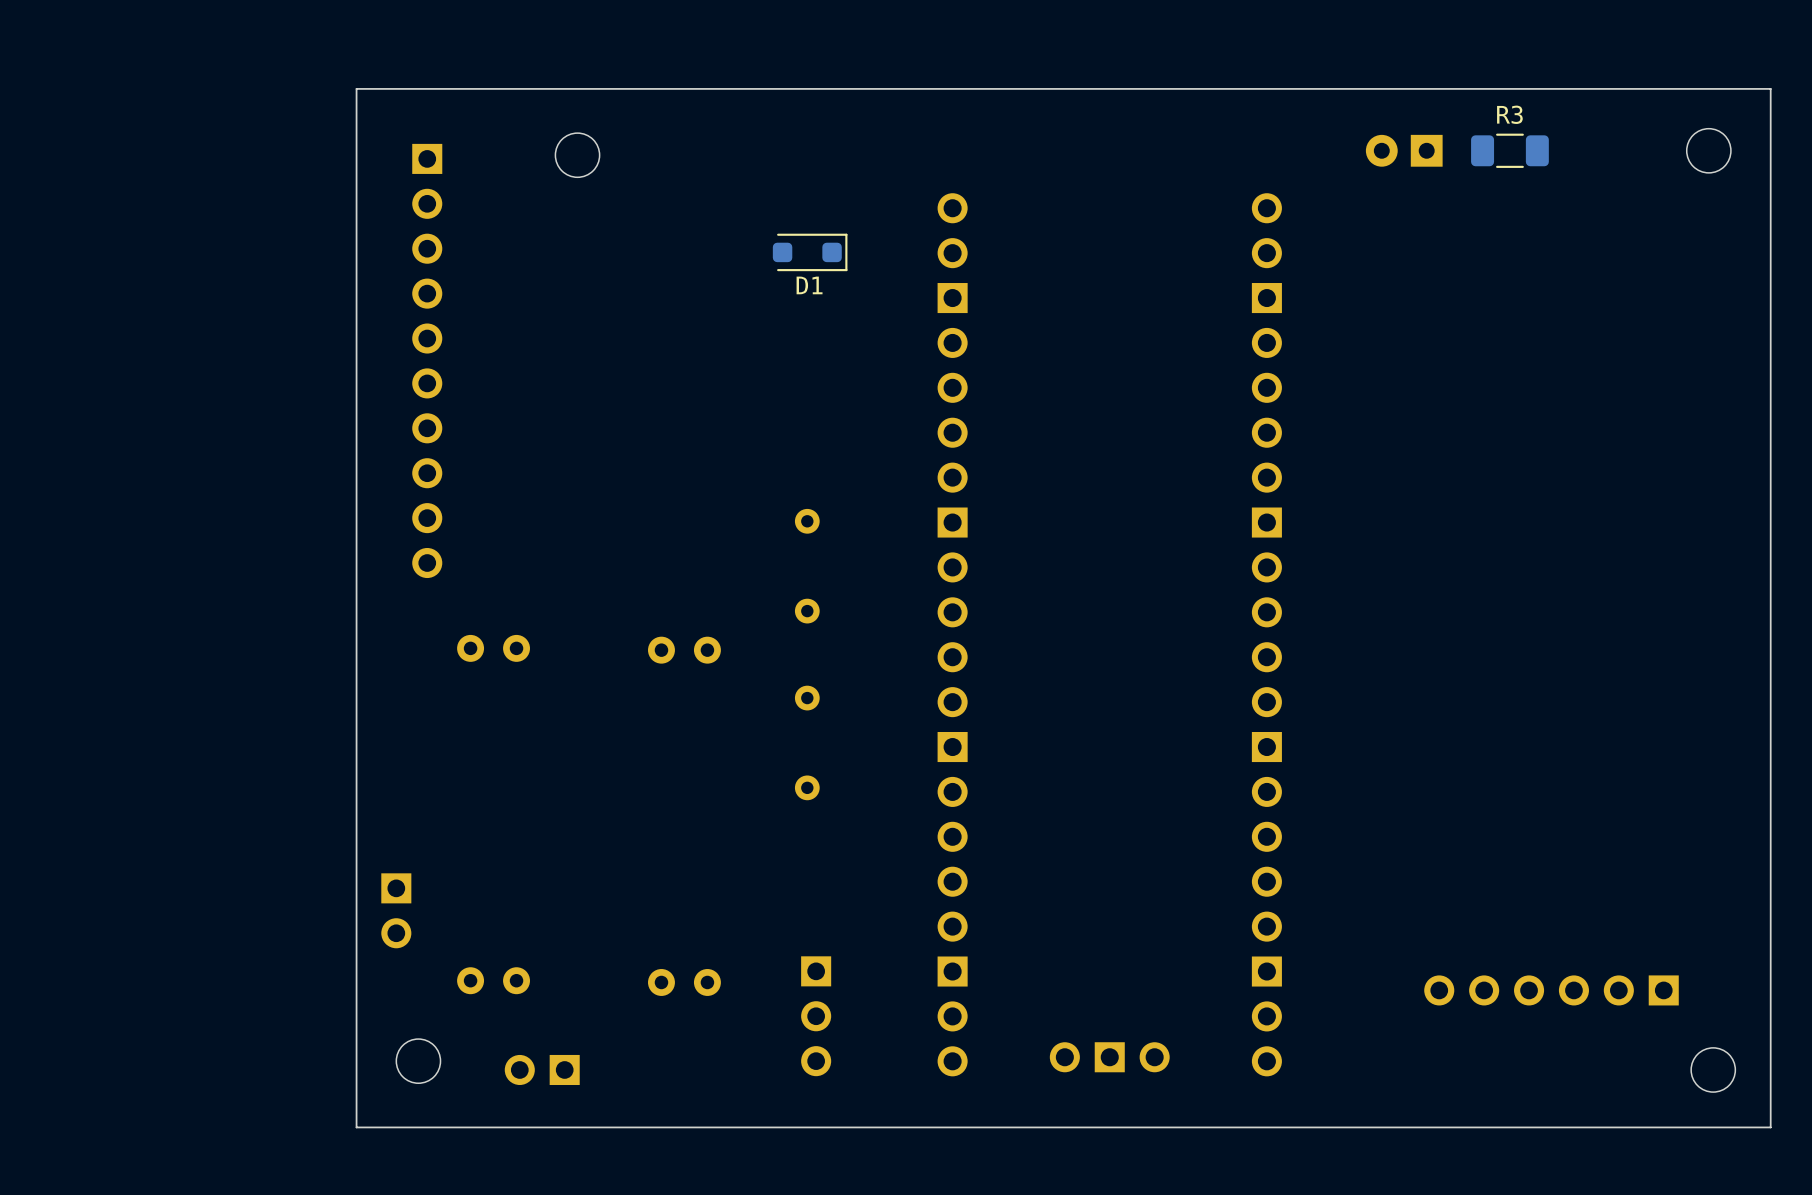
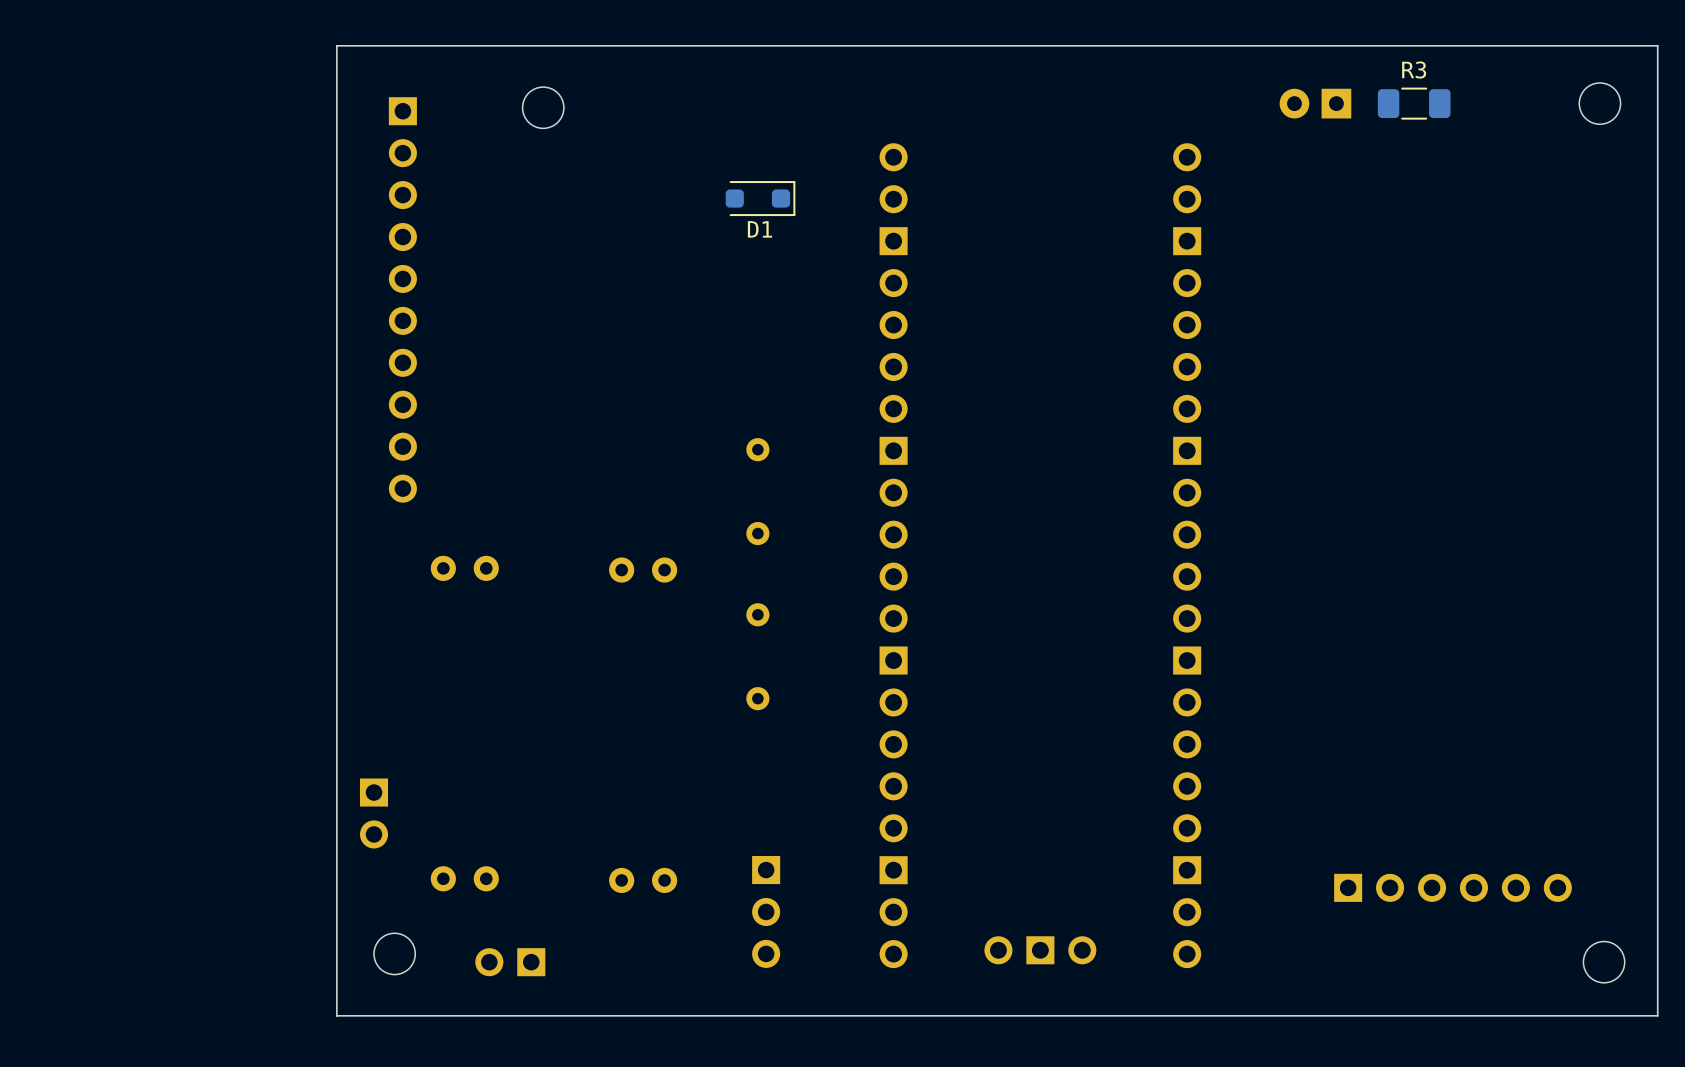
part rotation: 0° (1551, 990) -> 180° (1452, 887)

